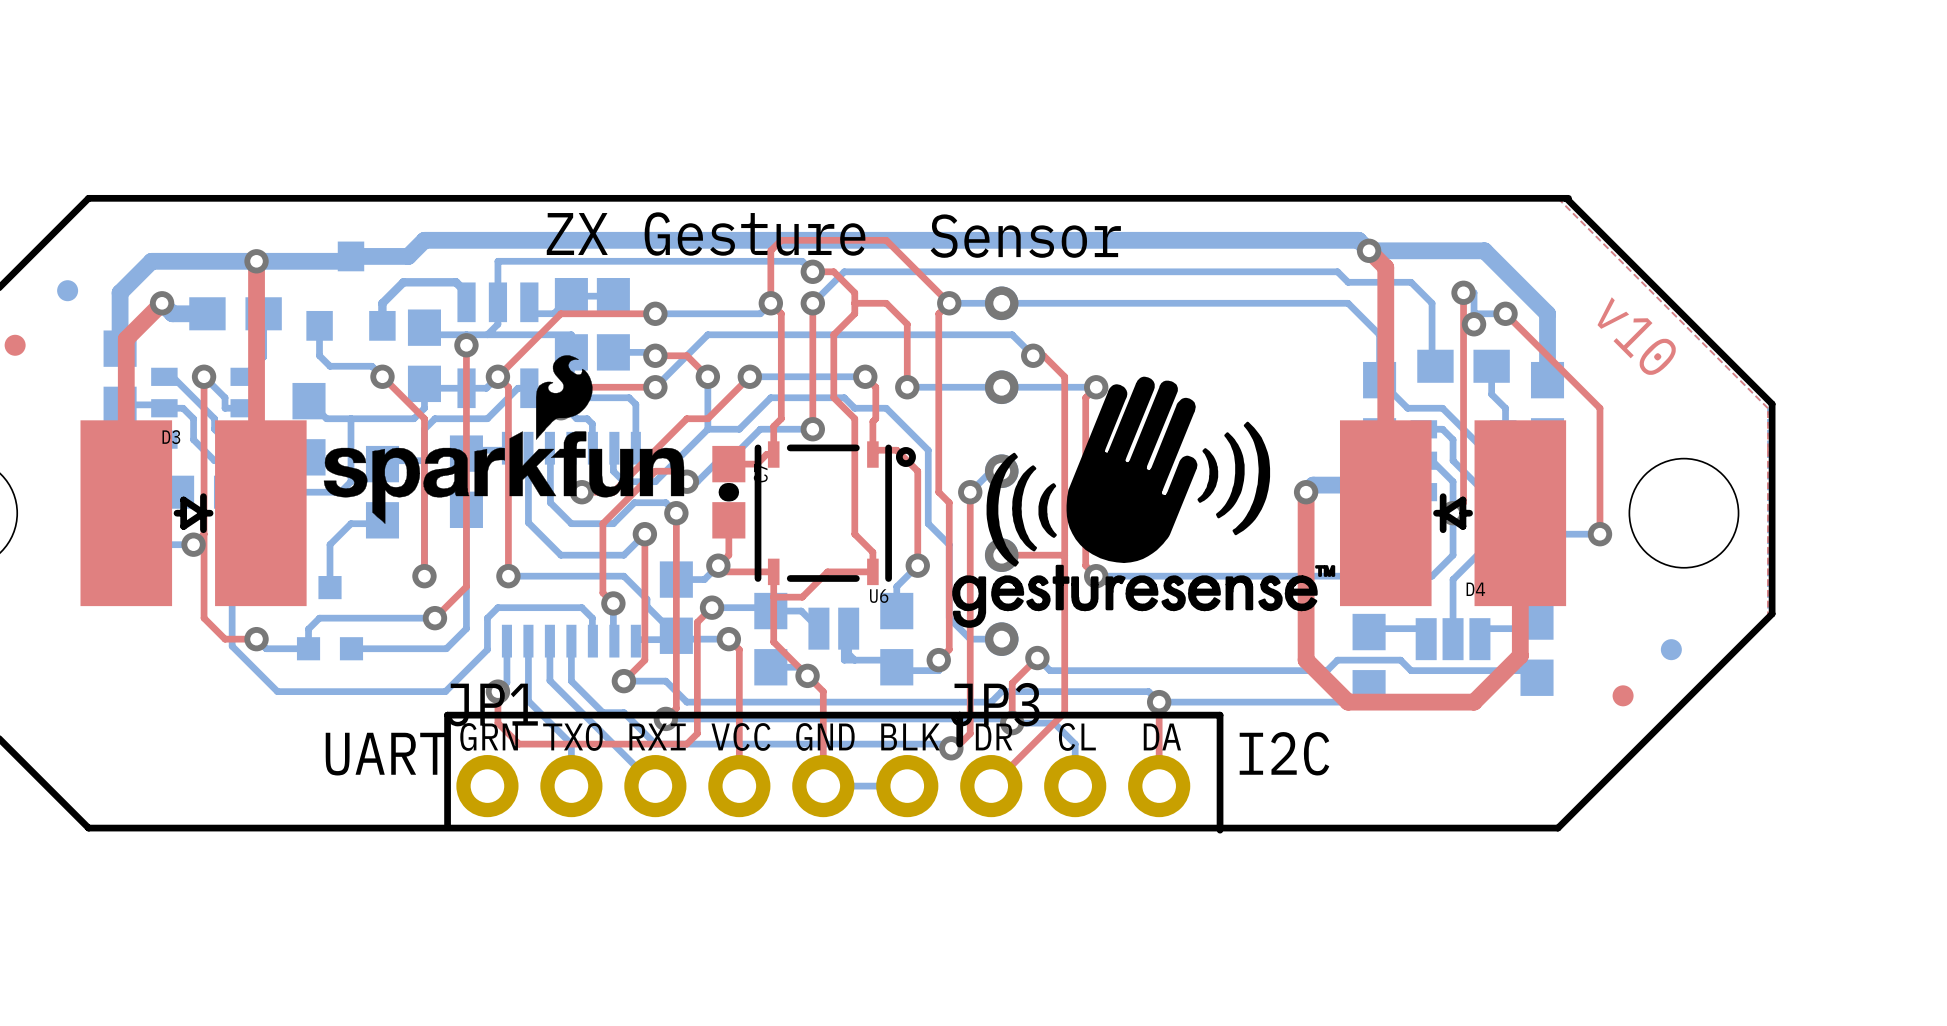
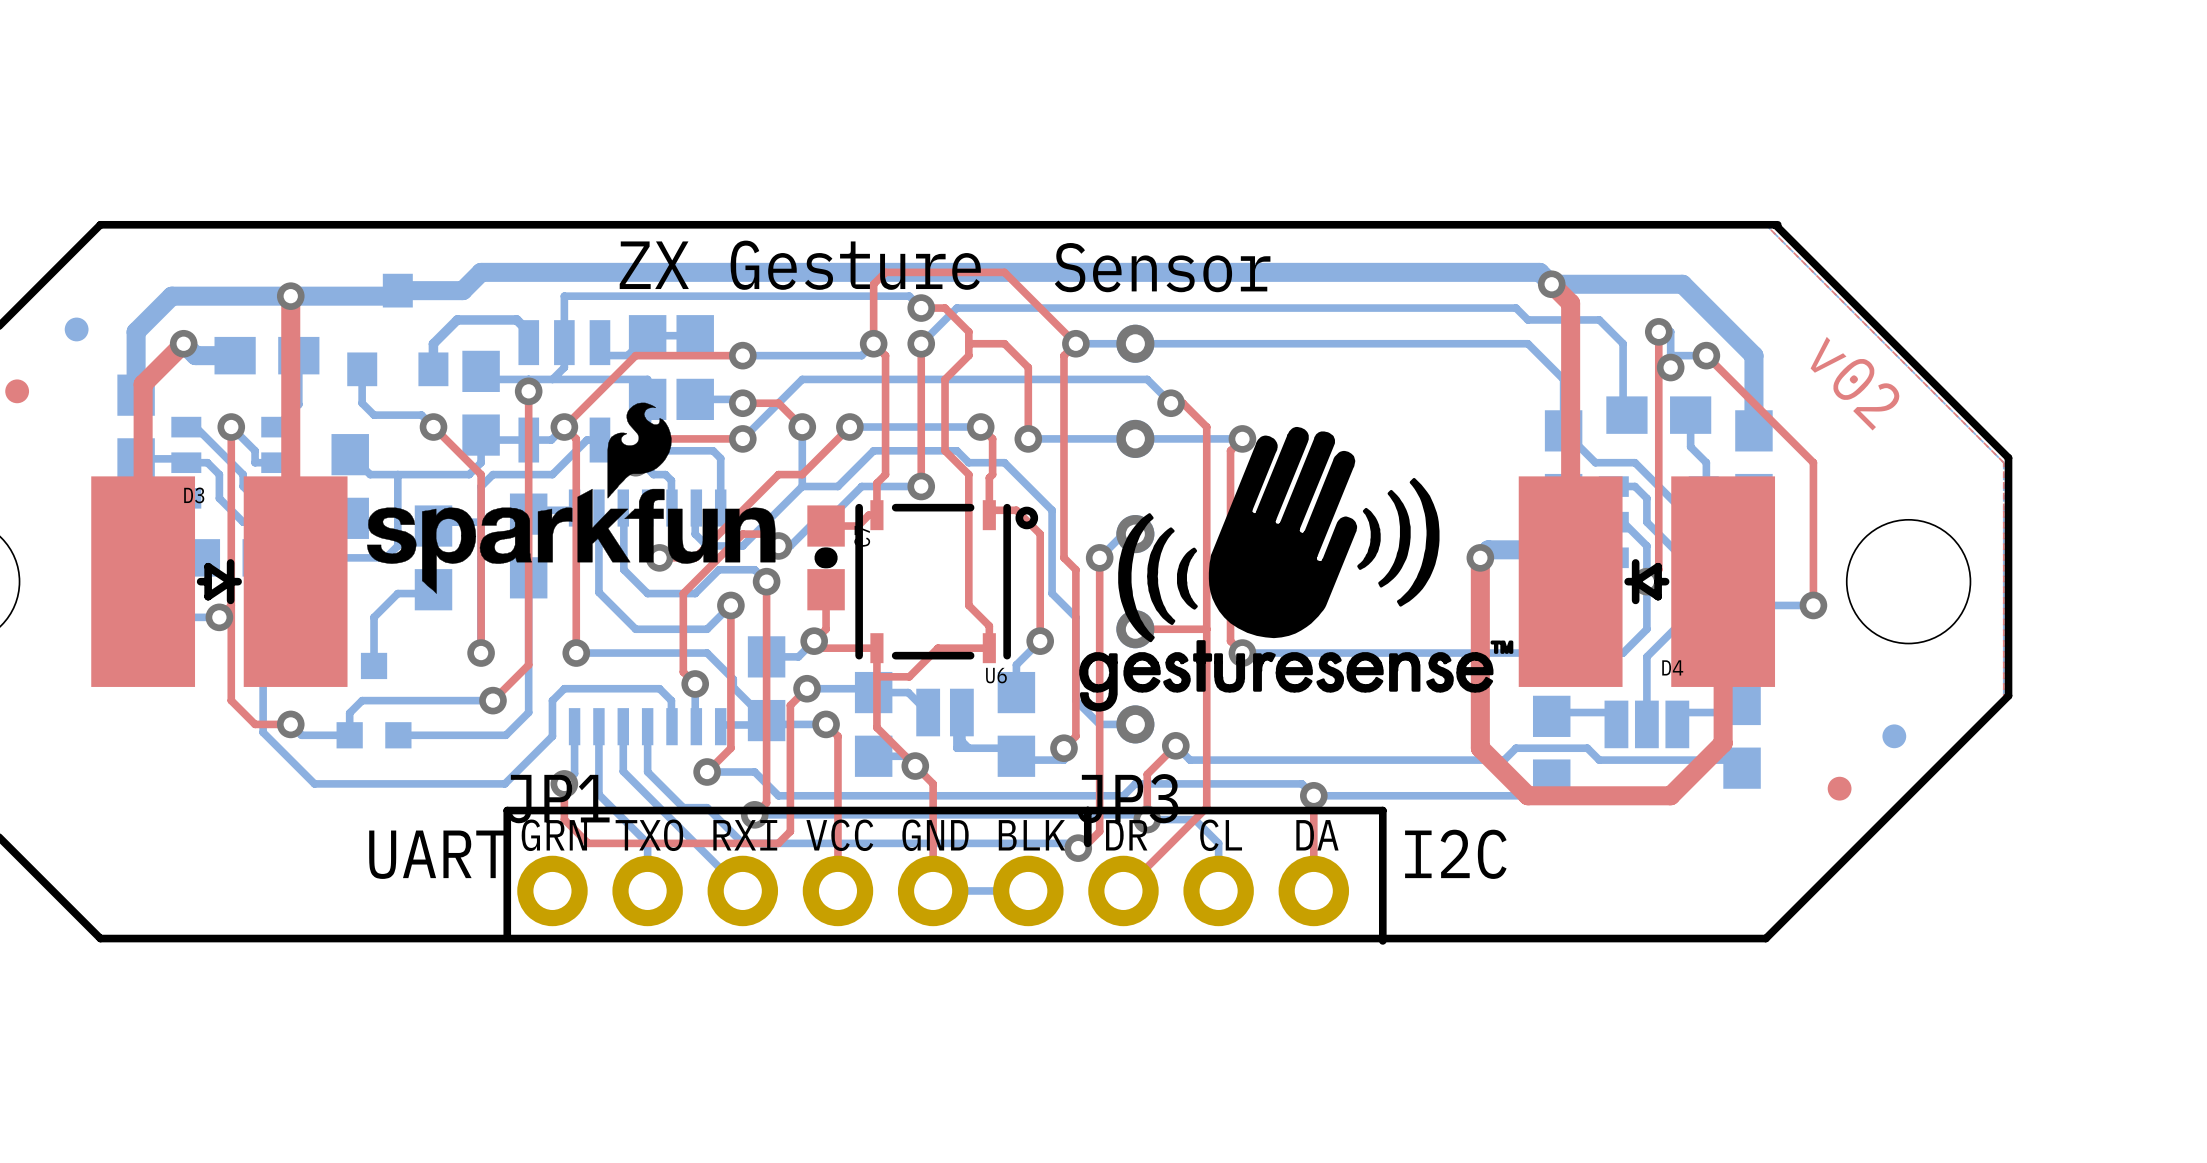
text: v10 (1636, 336) -> v02 (1855, 383)

